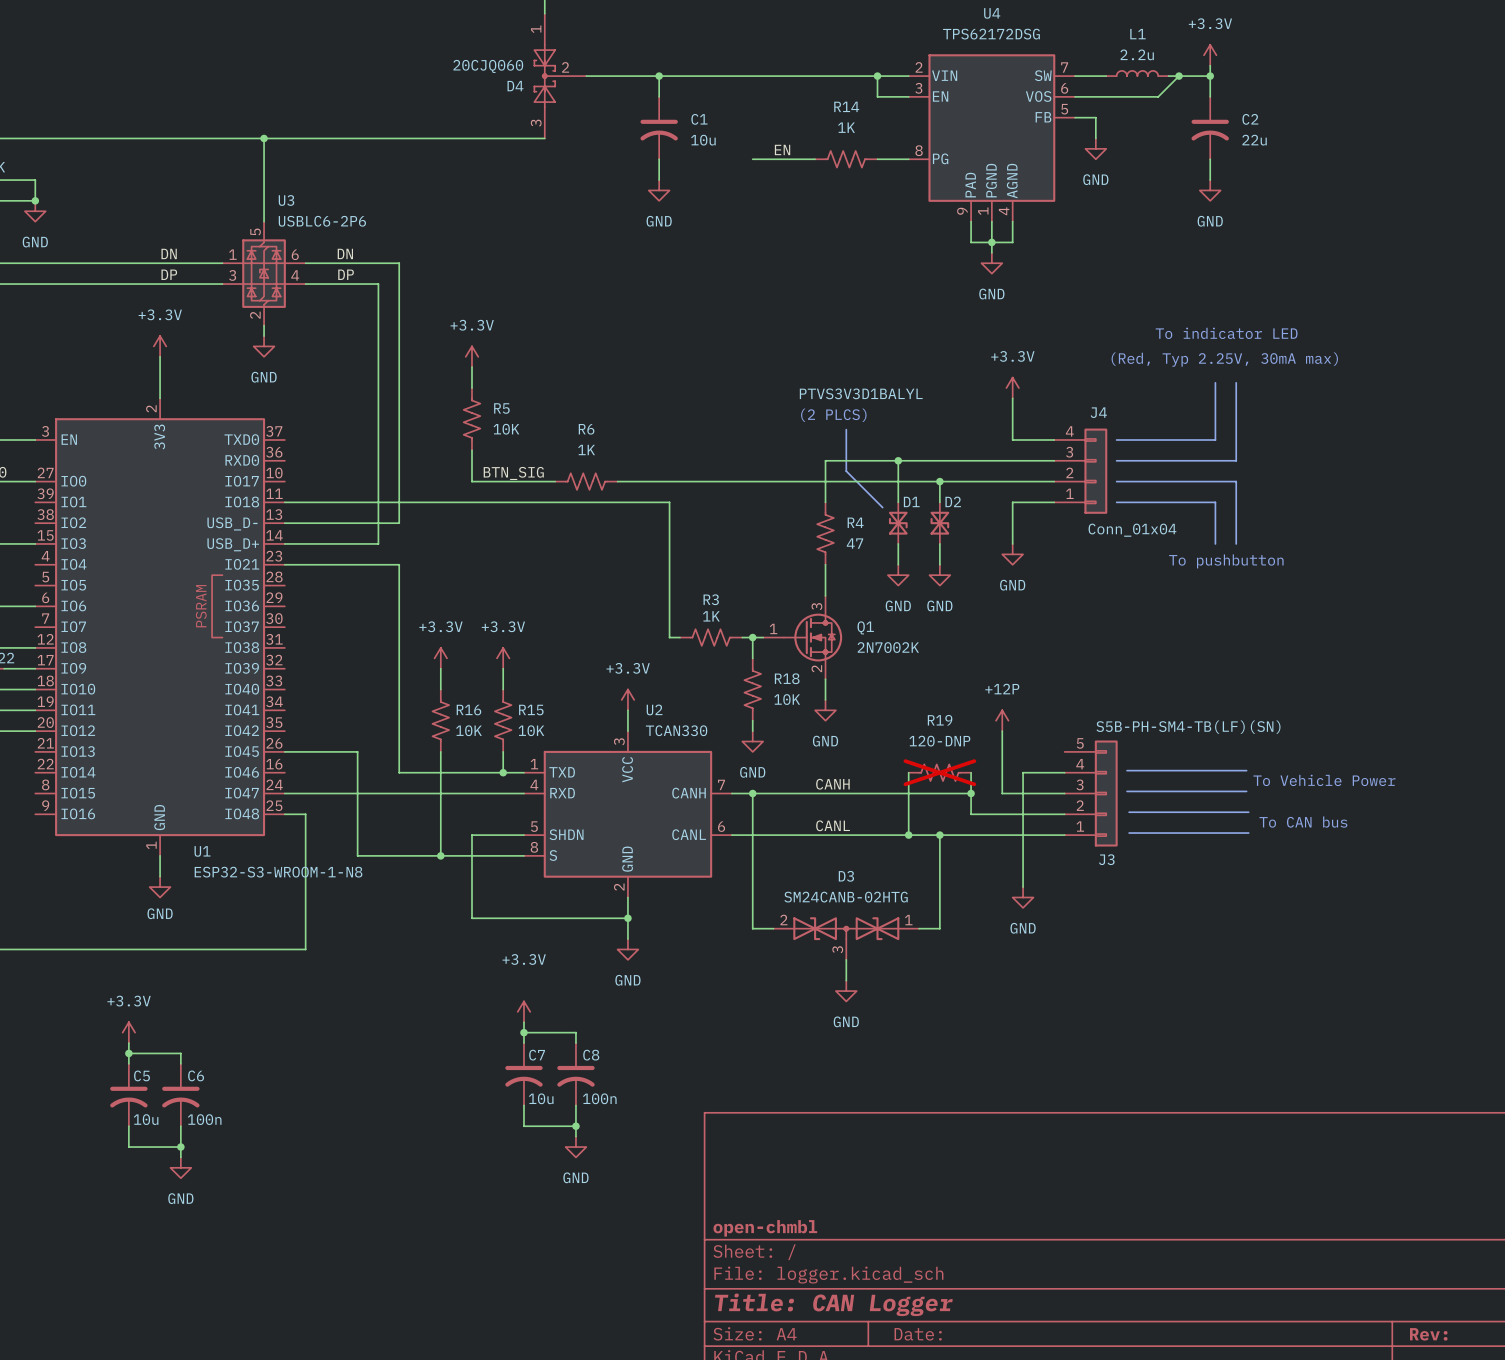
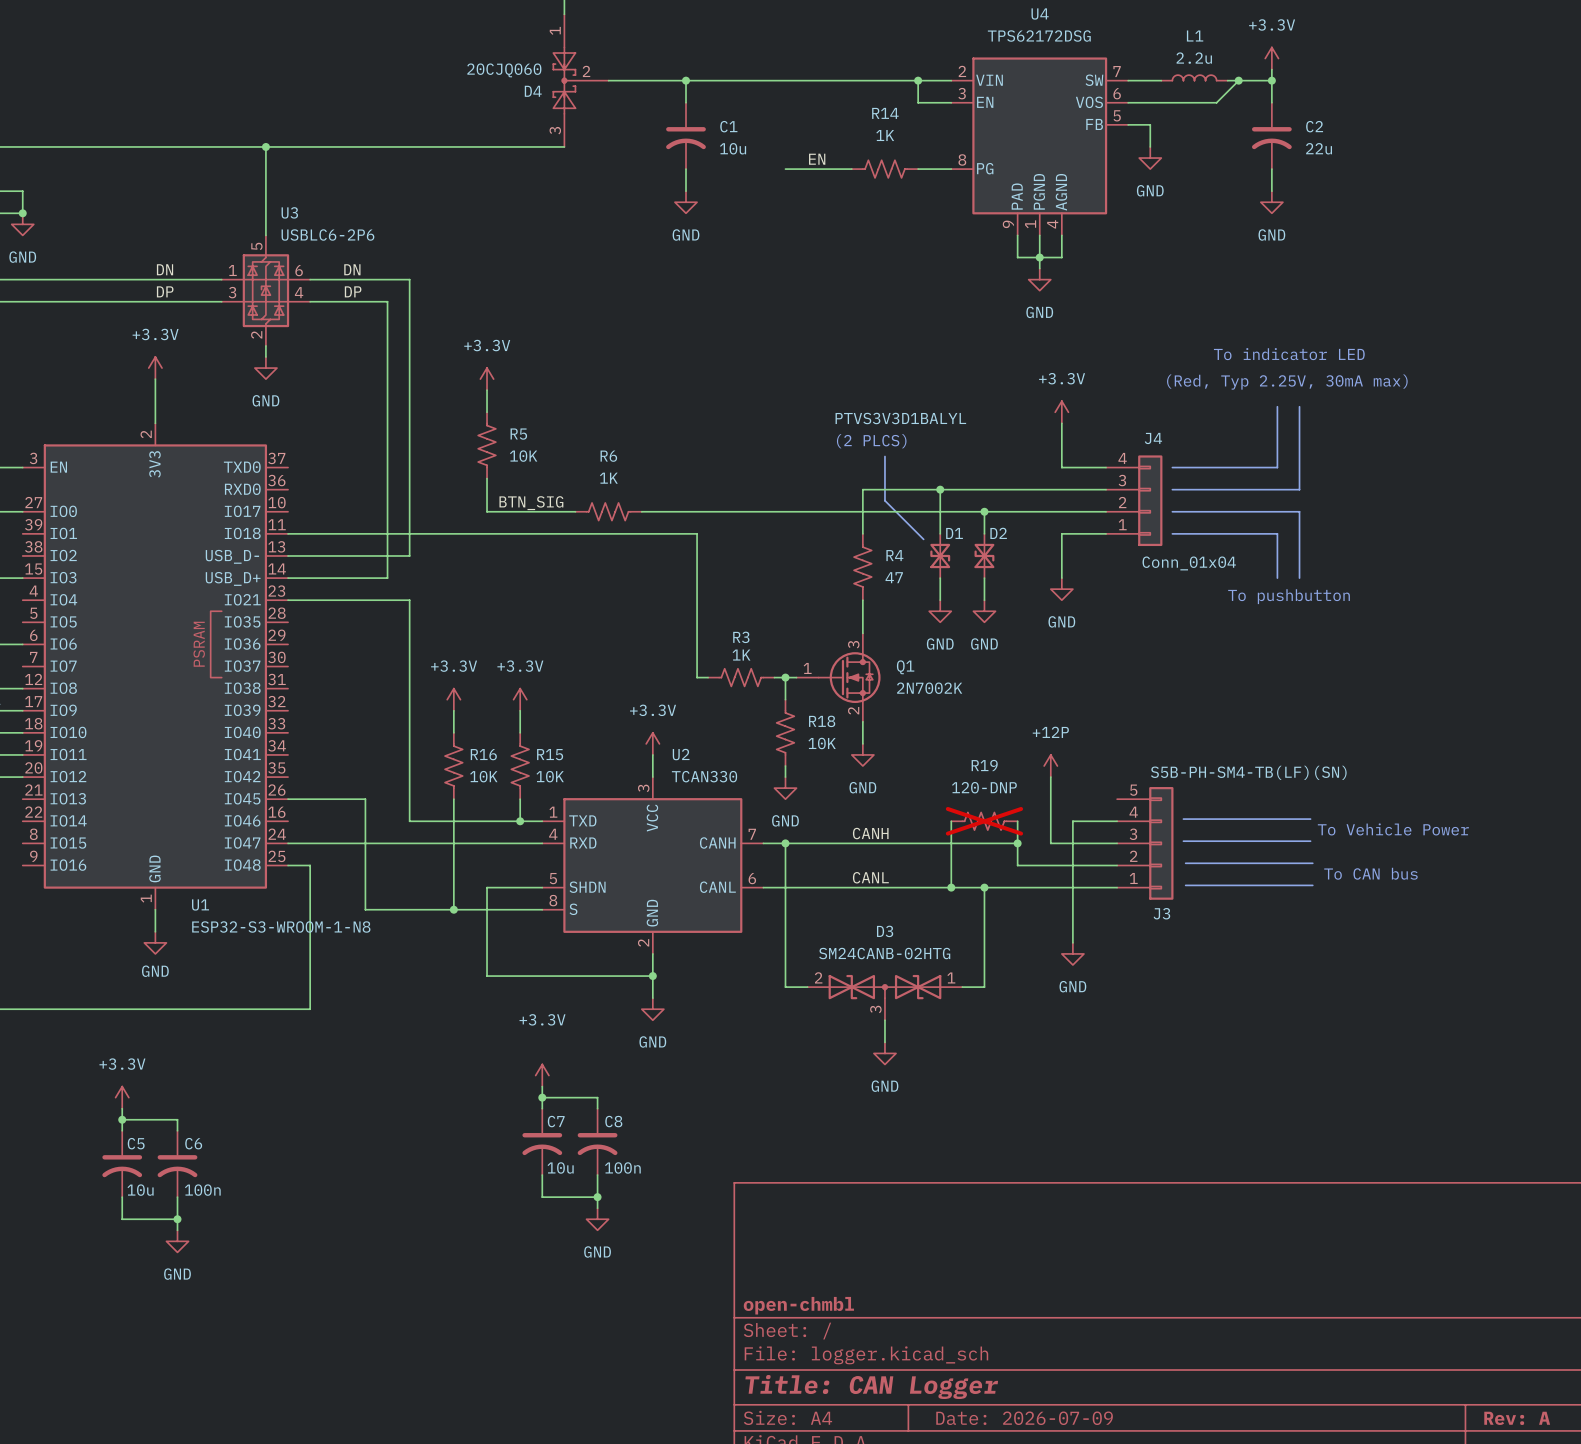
title block: Date: (918, 1334) -> Date: 2026-07-09 (1024, 1418)
title block: Rev: (1428, 1334) -> Rev: A (1517, 1418)

